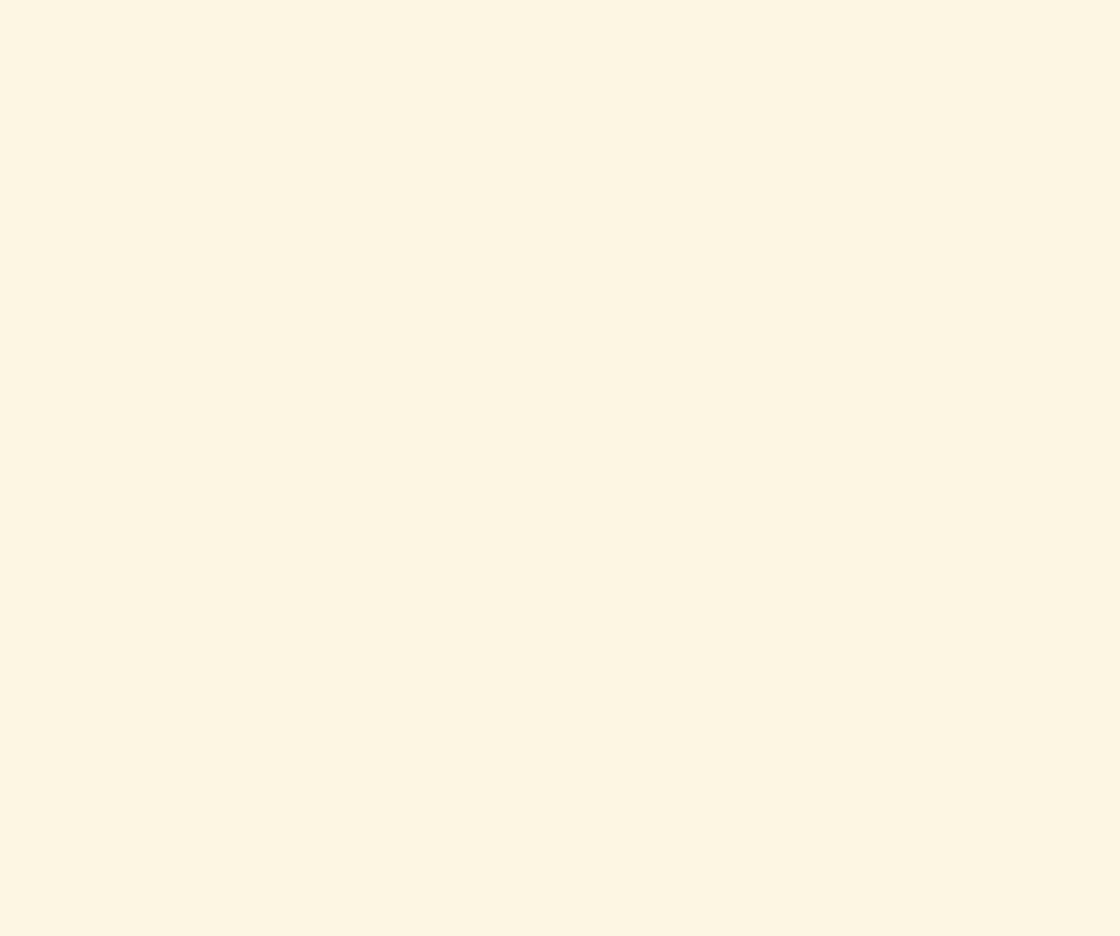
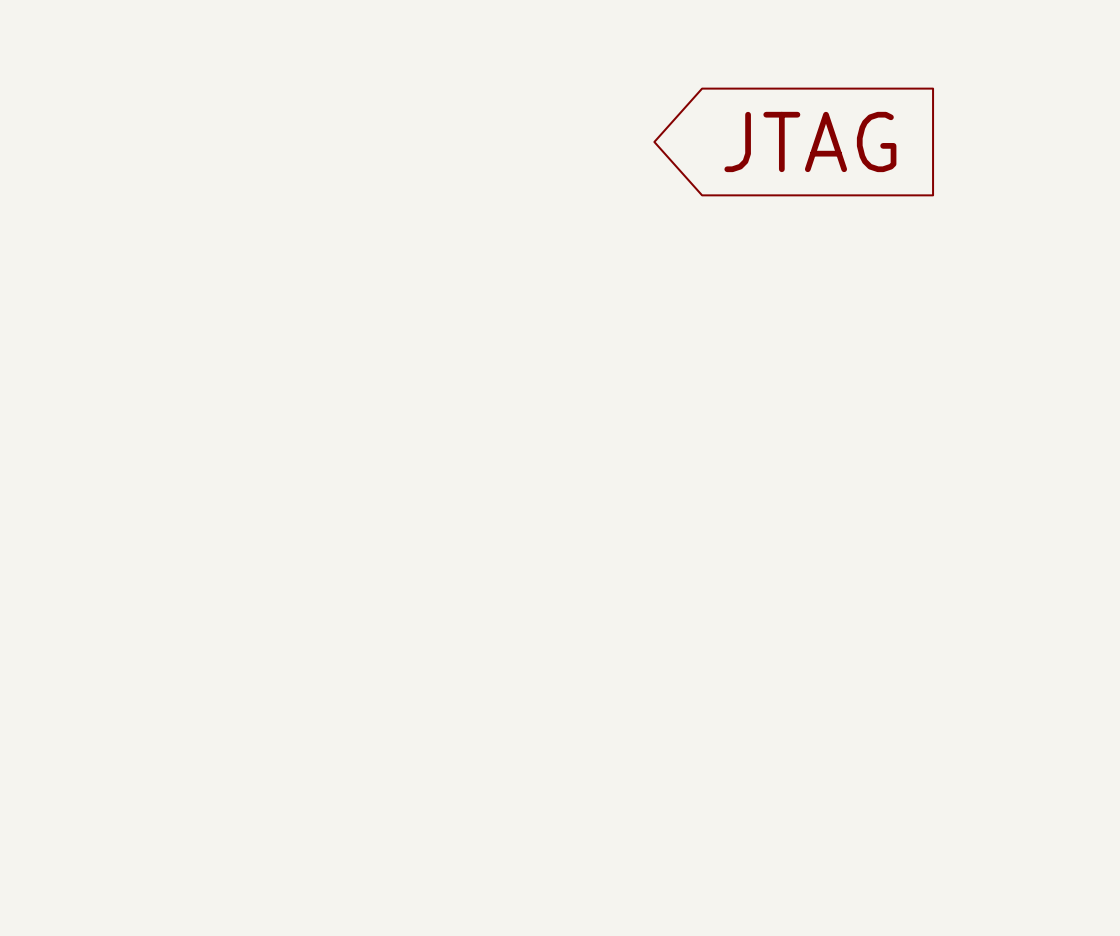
global label: none -> JTAG (810, 141)

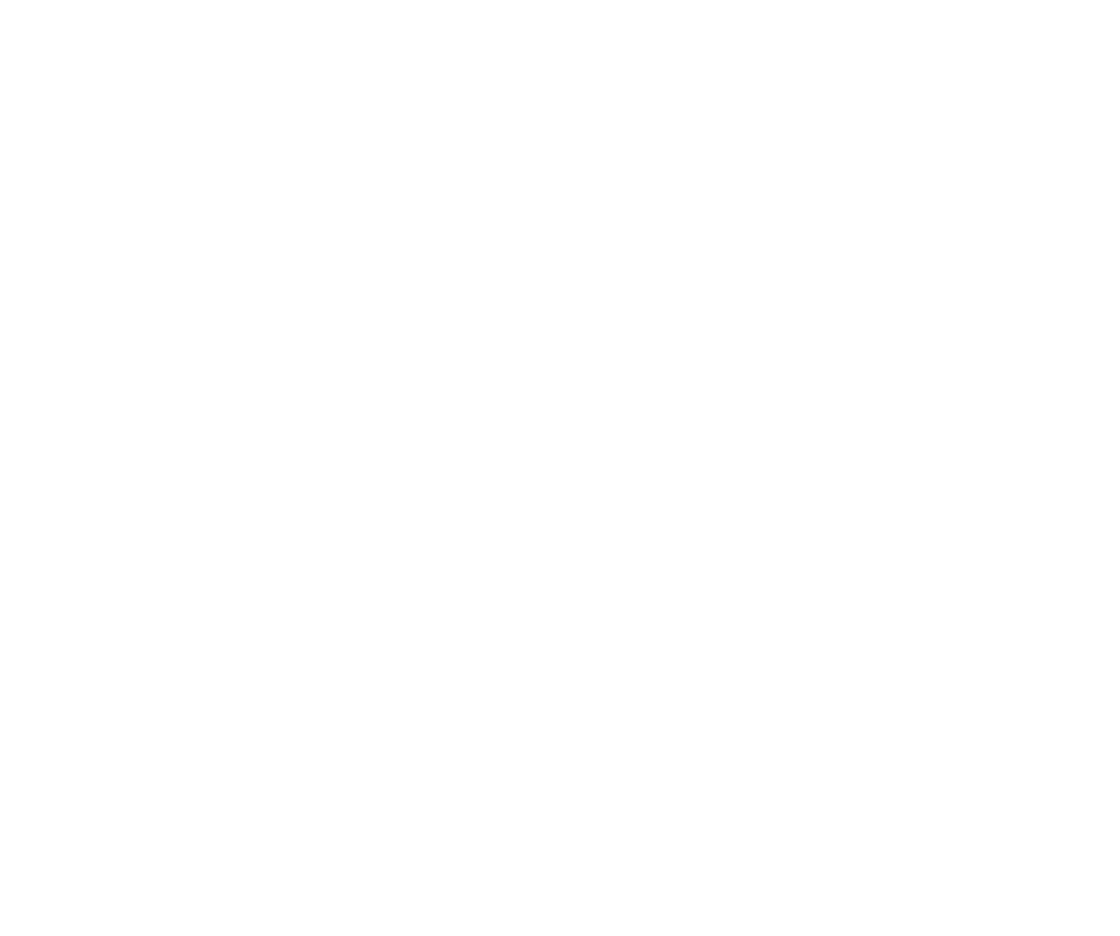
global label: JTAG (810, 141) -> none

